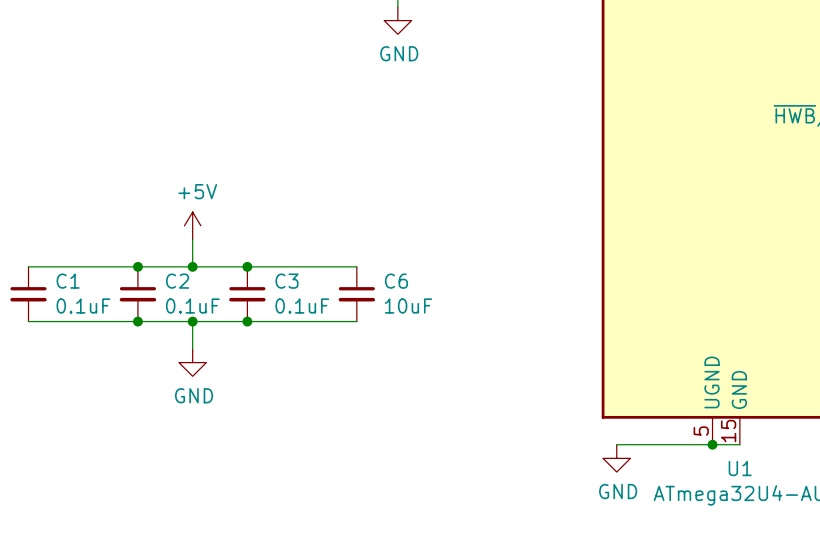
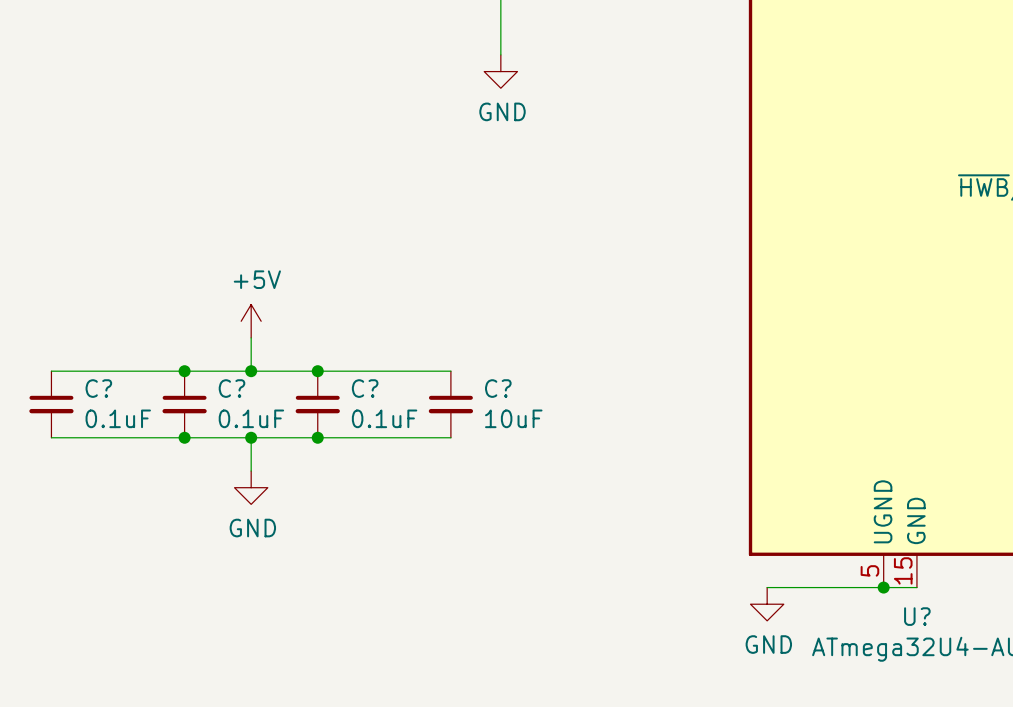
C1 name: C1 (68, 281) -> C? (98, 388)
C2 name: C2 (177, 281) -> C? (231, 388)
C3 name: C3 (286, 281) -> C? (365, 388)
C6 name: C6 (396, 281) -> C? (498, 388)
U1 name: U1 (740, 468) -> U? (917, 616)

